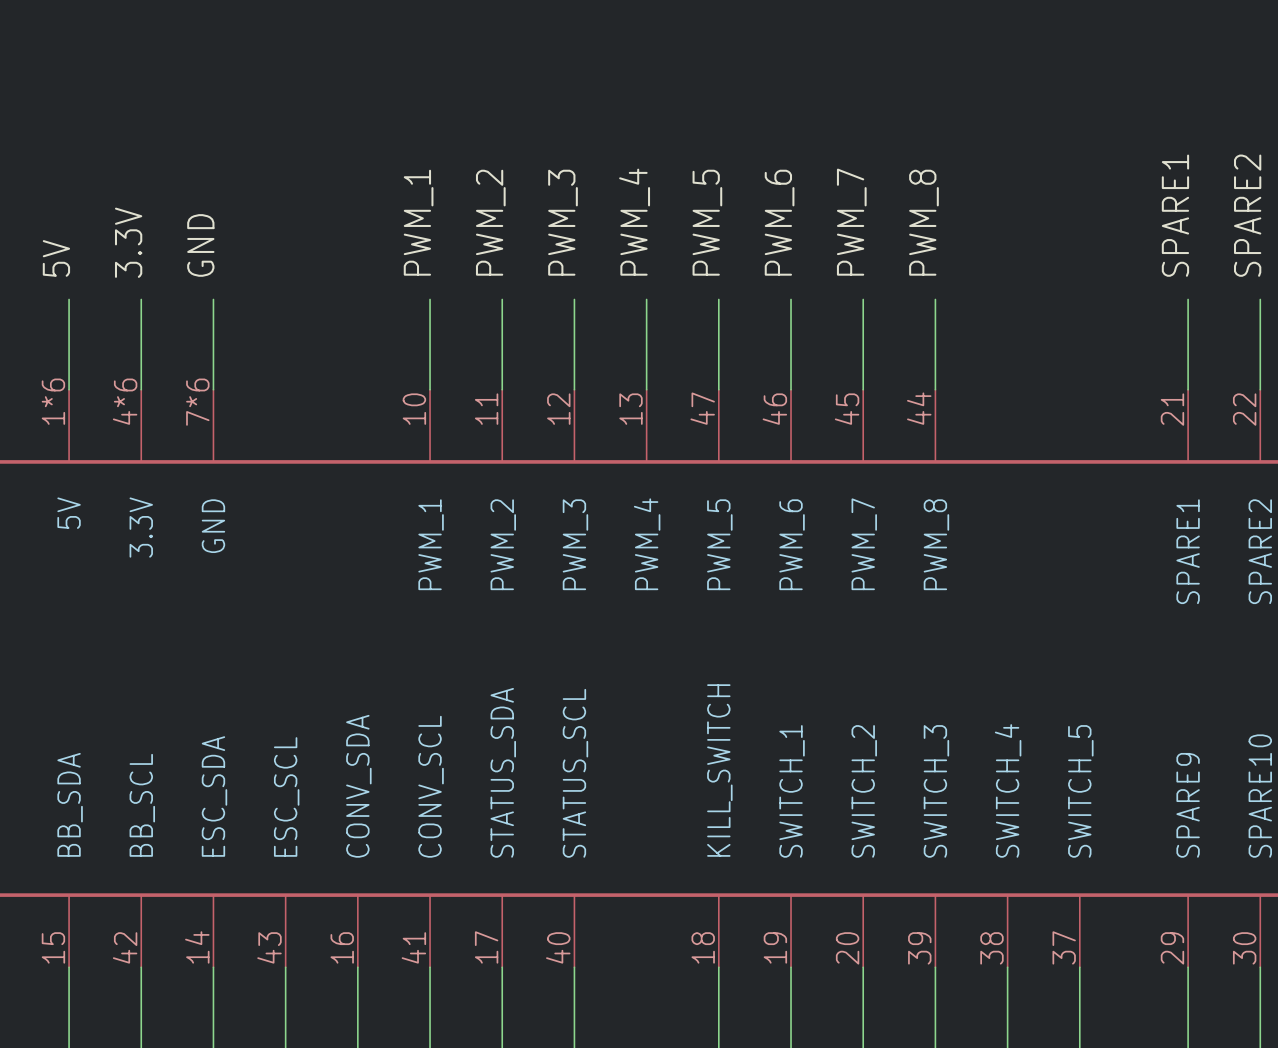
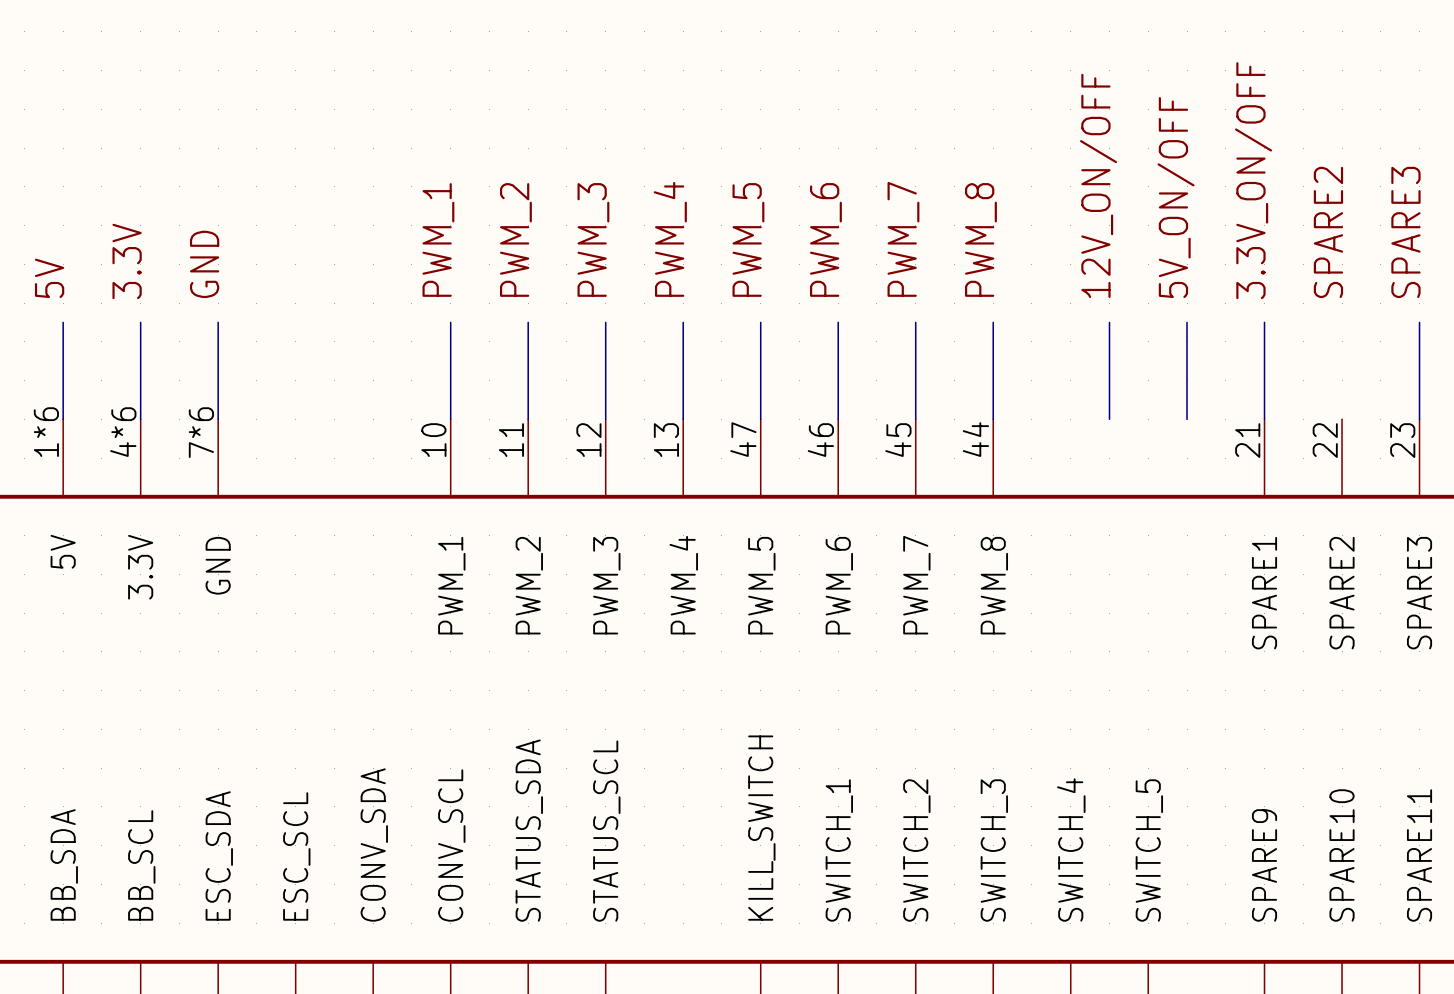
label: none -> 12V_ON/OFF (1098, 185)
label: none -> 5V_ON/OFF (1176, 197)
label: SPARE1 (1175, 215) -> 3.3V_ON/OFF (1253, 180)
wire: none -> (1109, 322) (1109, 419)
wire: (1260, 299) (1260, 389) -> (1187, 322) (1187, 419)

